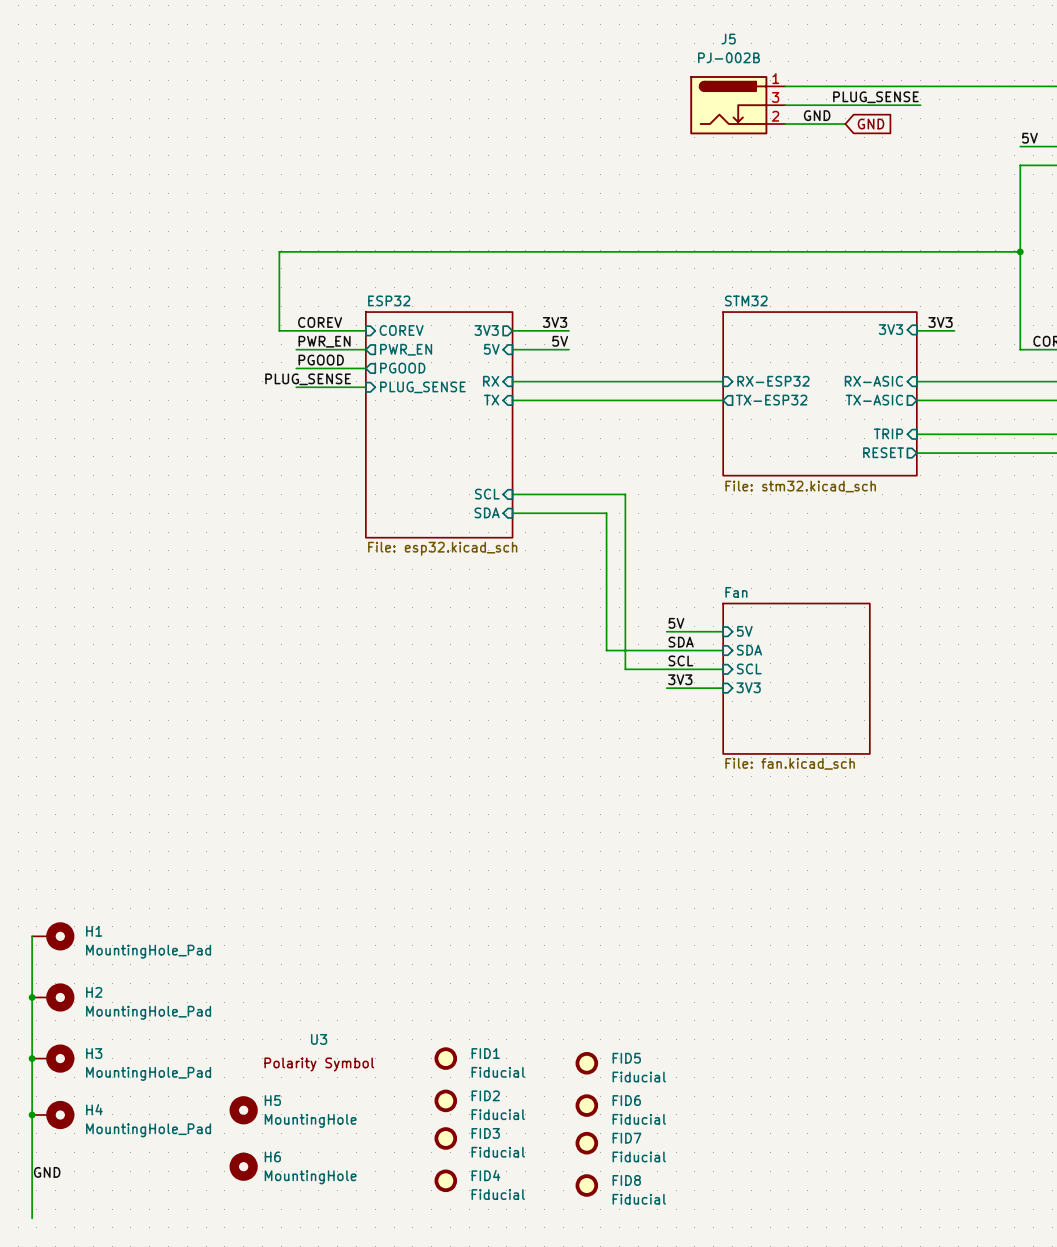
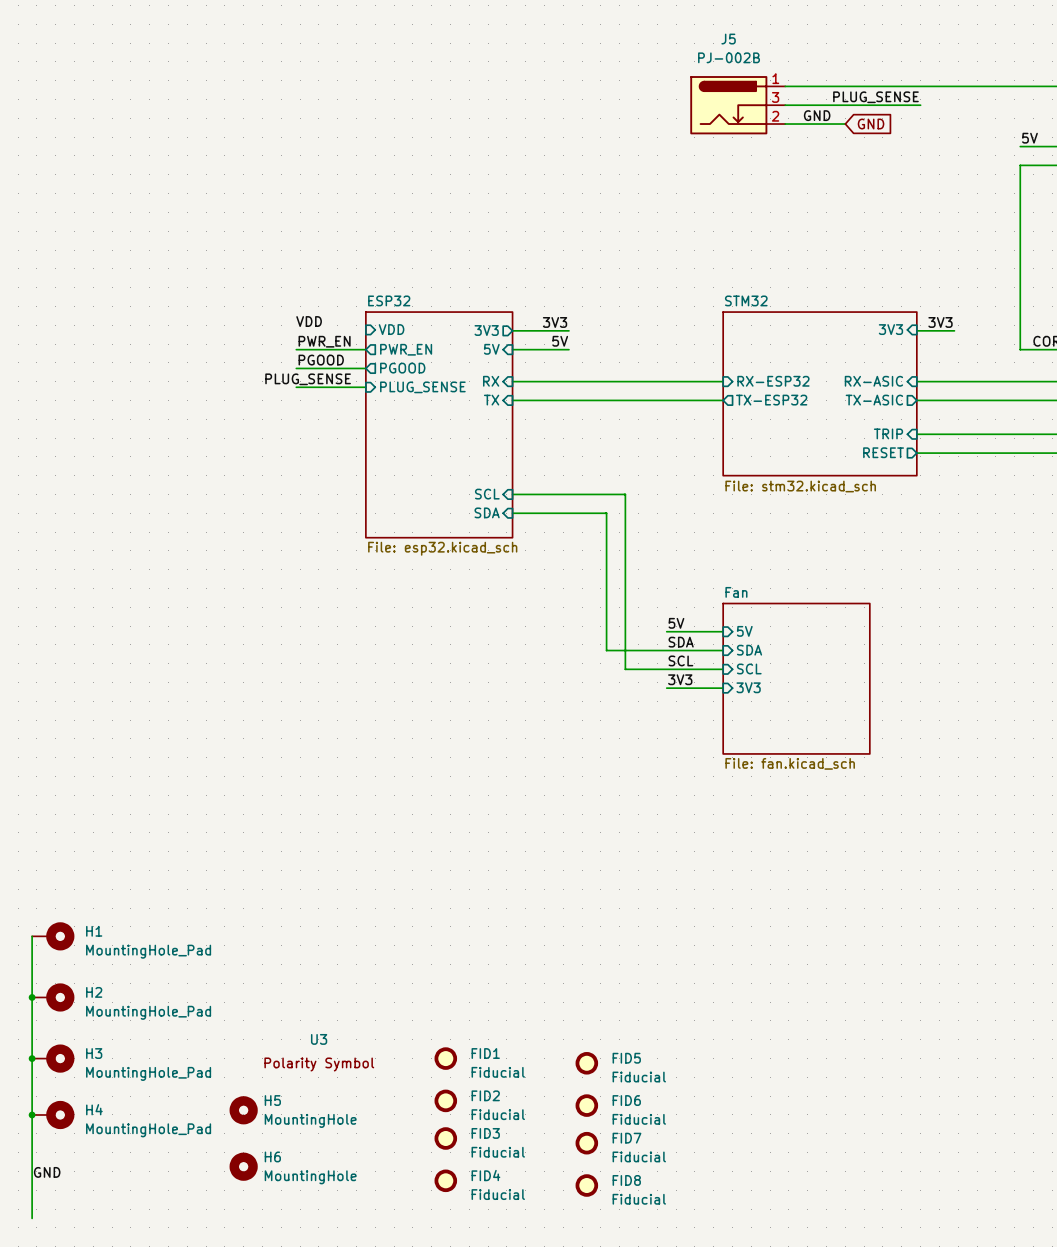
wire: (1020, 251) (279, 251) (279, 330) (365, 330) -> none
junction: (1020, 251) -> none
label: COREV (320, 322) -> VDD (309, 321)
sheet pin: COREV (401, 330) -> VDD (391, 329)

